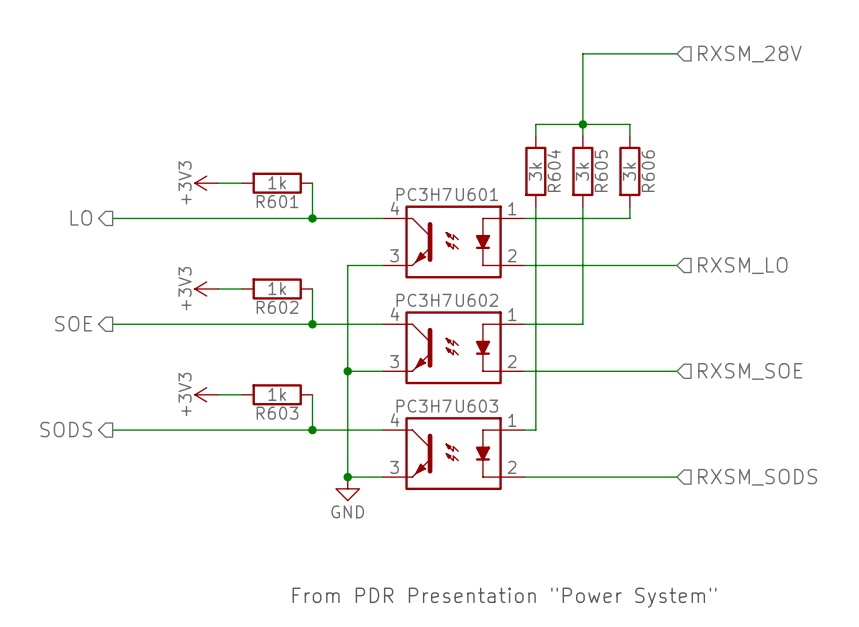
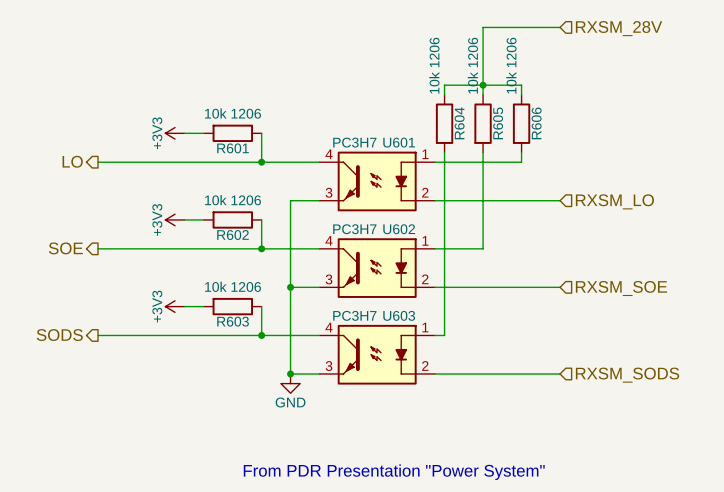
R604 value: 3k (535, 171) -> 10k 1206 (434, 65)
R605 value: 3k (582, 171) -> 10k 1206 (472, 65)
R606 value: 3k (629, 171) -> 10k 1206 (511, 65)
R601 value: 1k (277, 182) -> 10k 1206 (233, 113)
R602 value: 1k (277, 288) -> 10k 1206 (233, 200)
R603 value: 1k (277, 394) -> 10k 1206 (233, 286)

